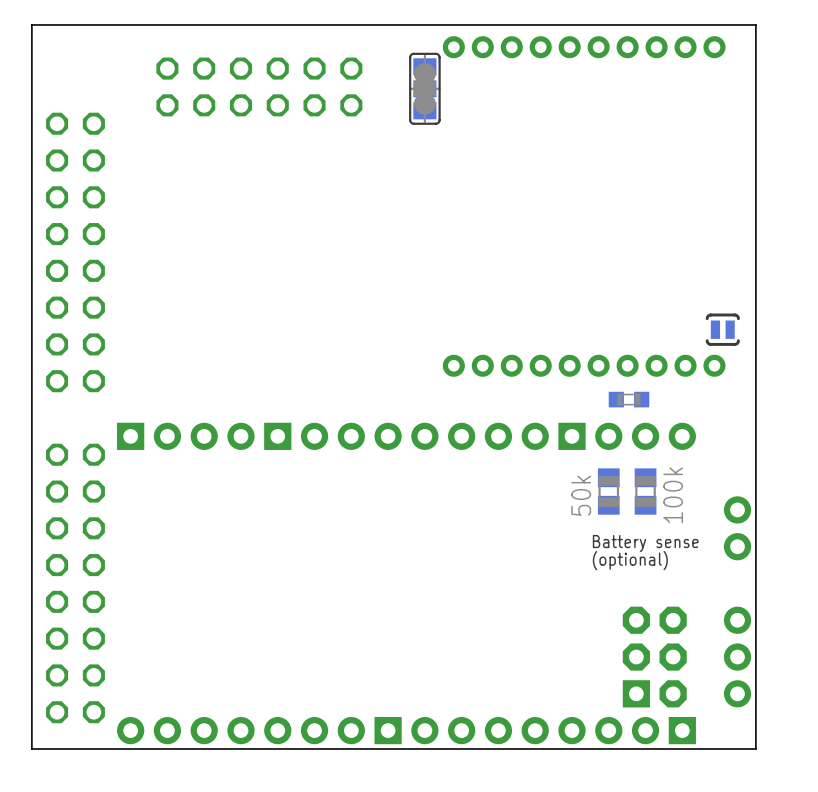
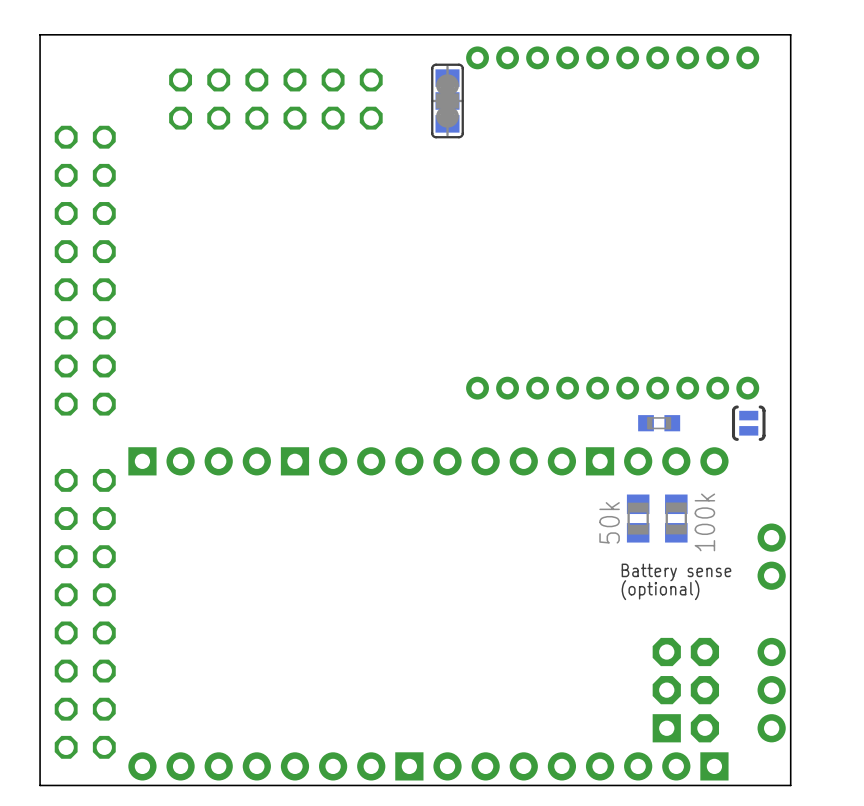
part rotation: 0° (722, 329) -> 90° clockwise (748, 423)
part position: (722, 329) -> (748, 423)

